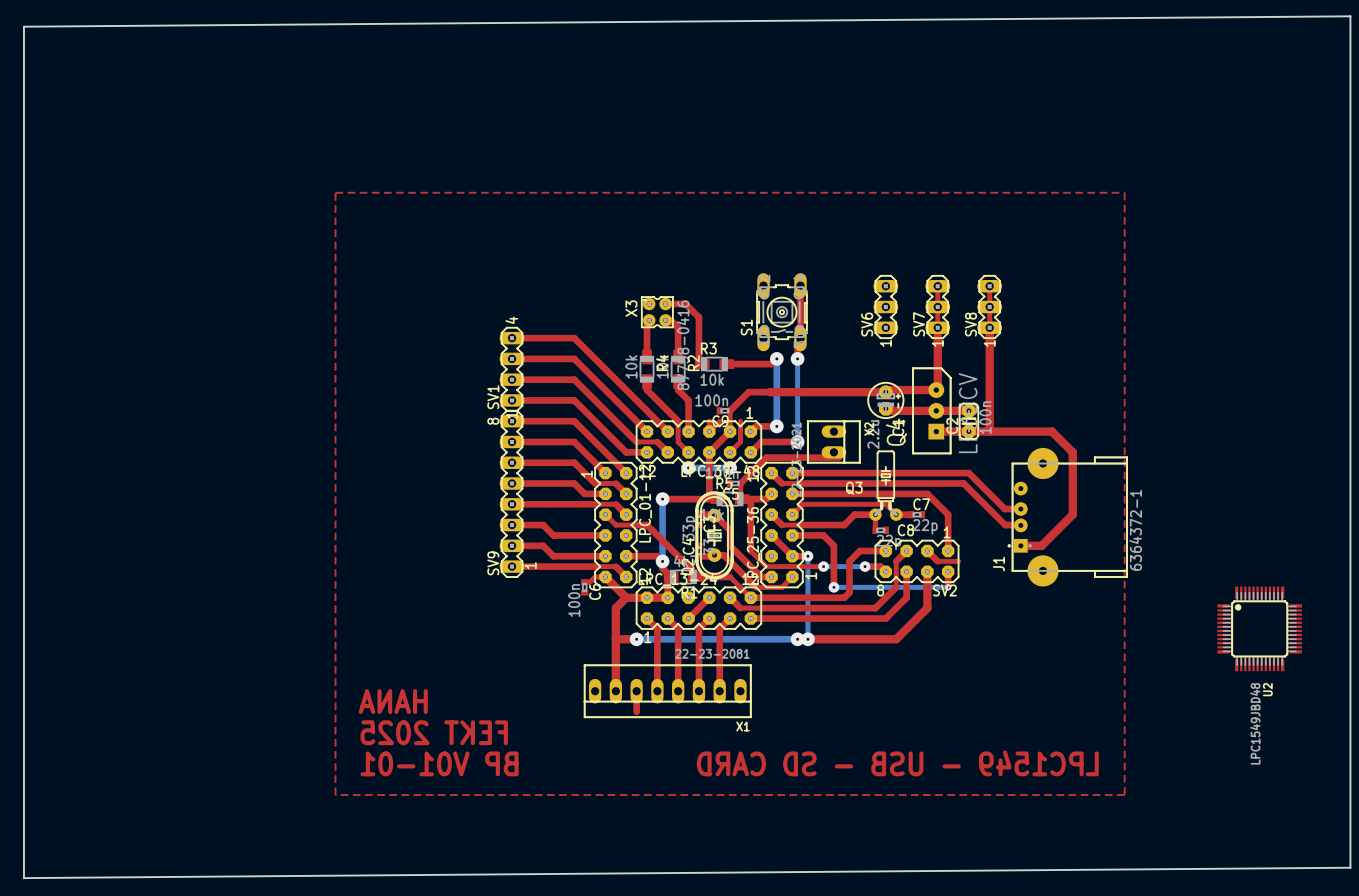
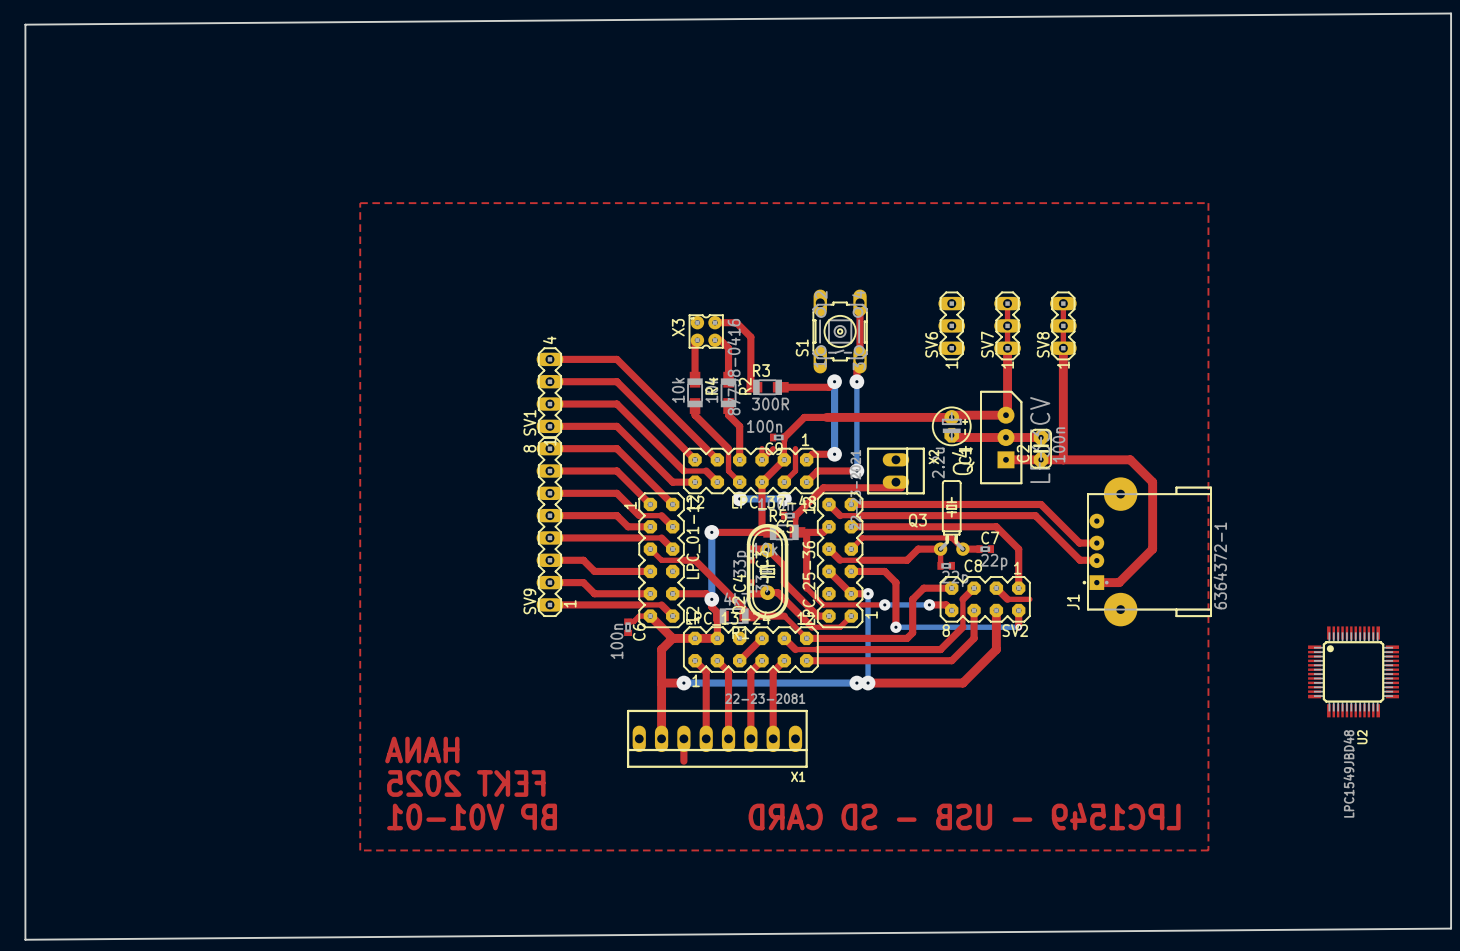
R3 value: 10k (712, 379) -> 300R (770, 404)

